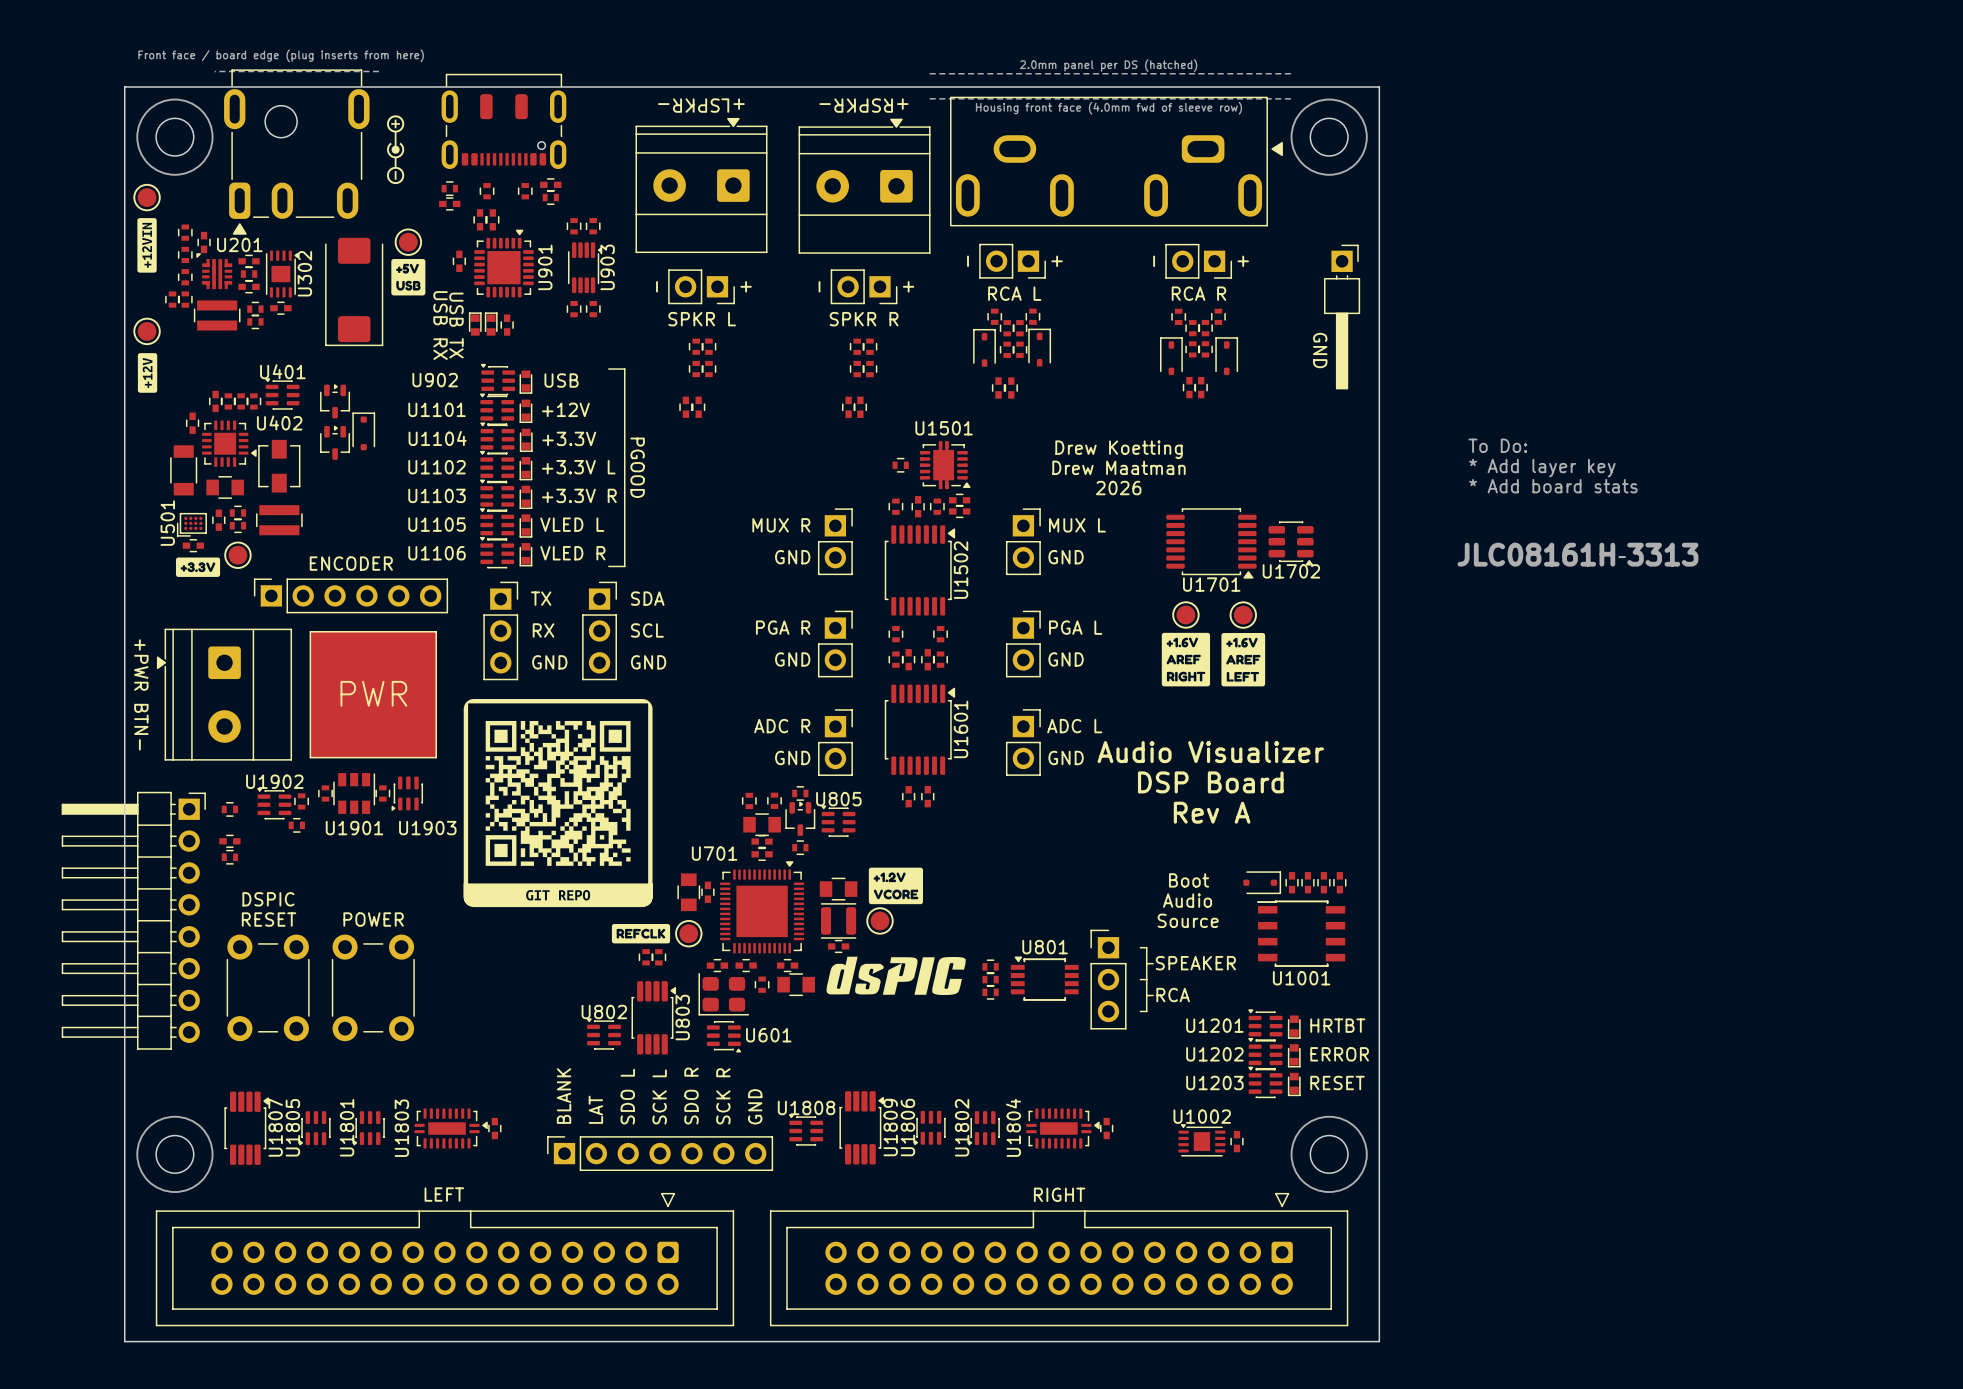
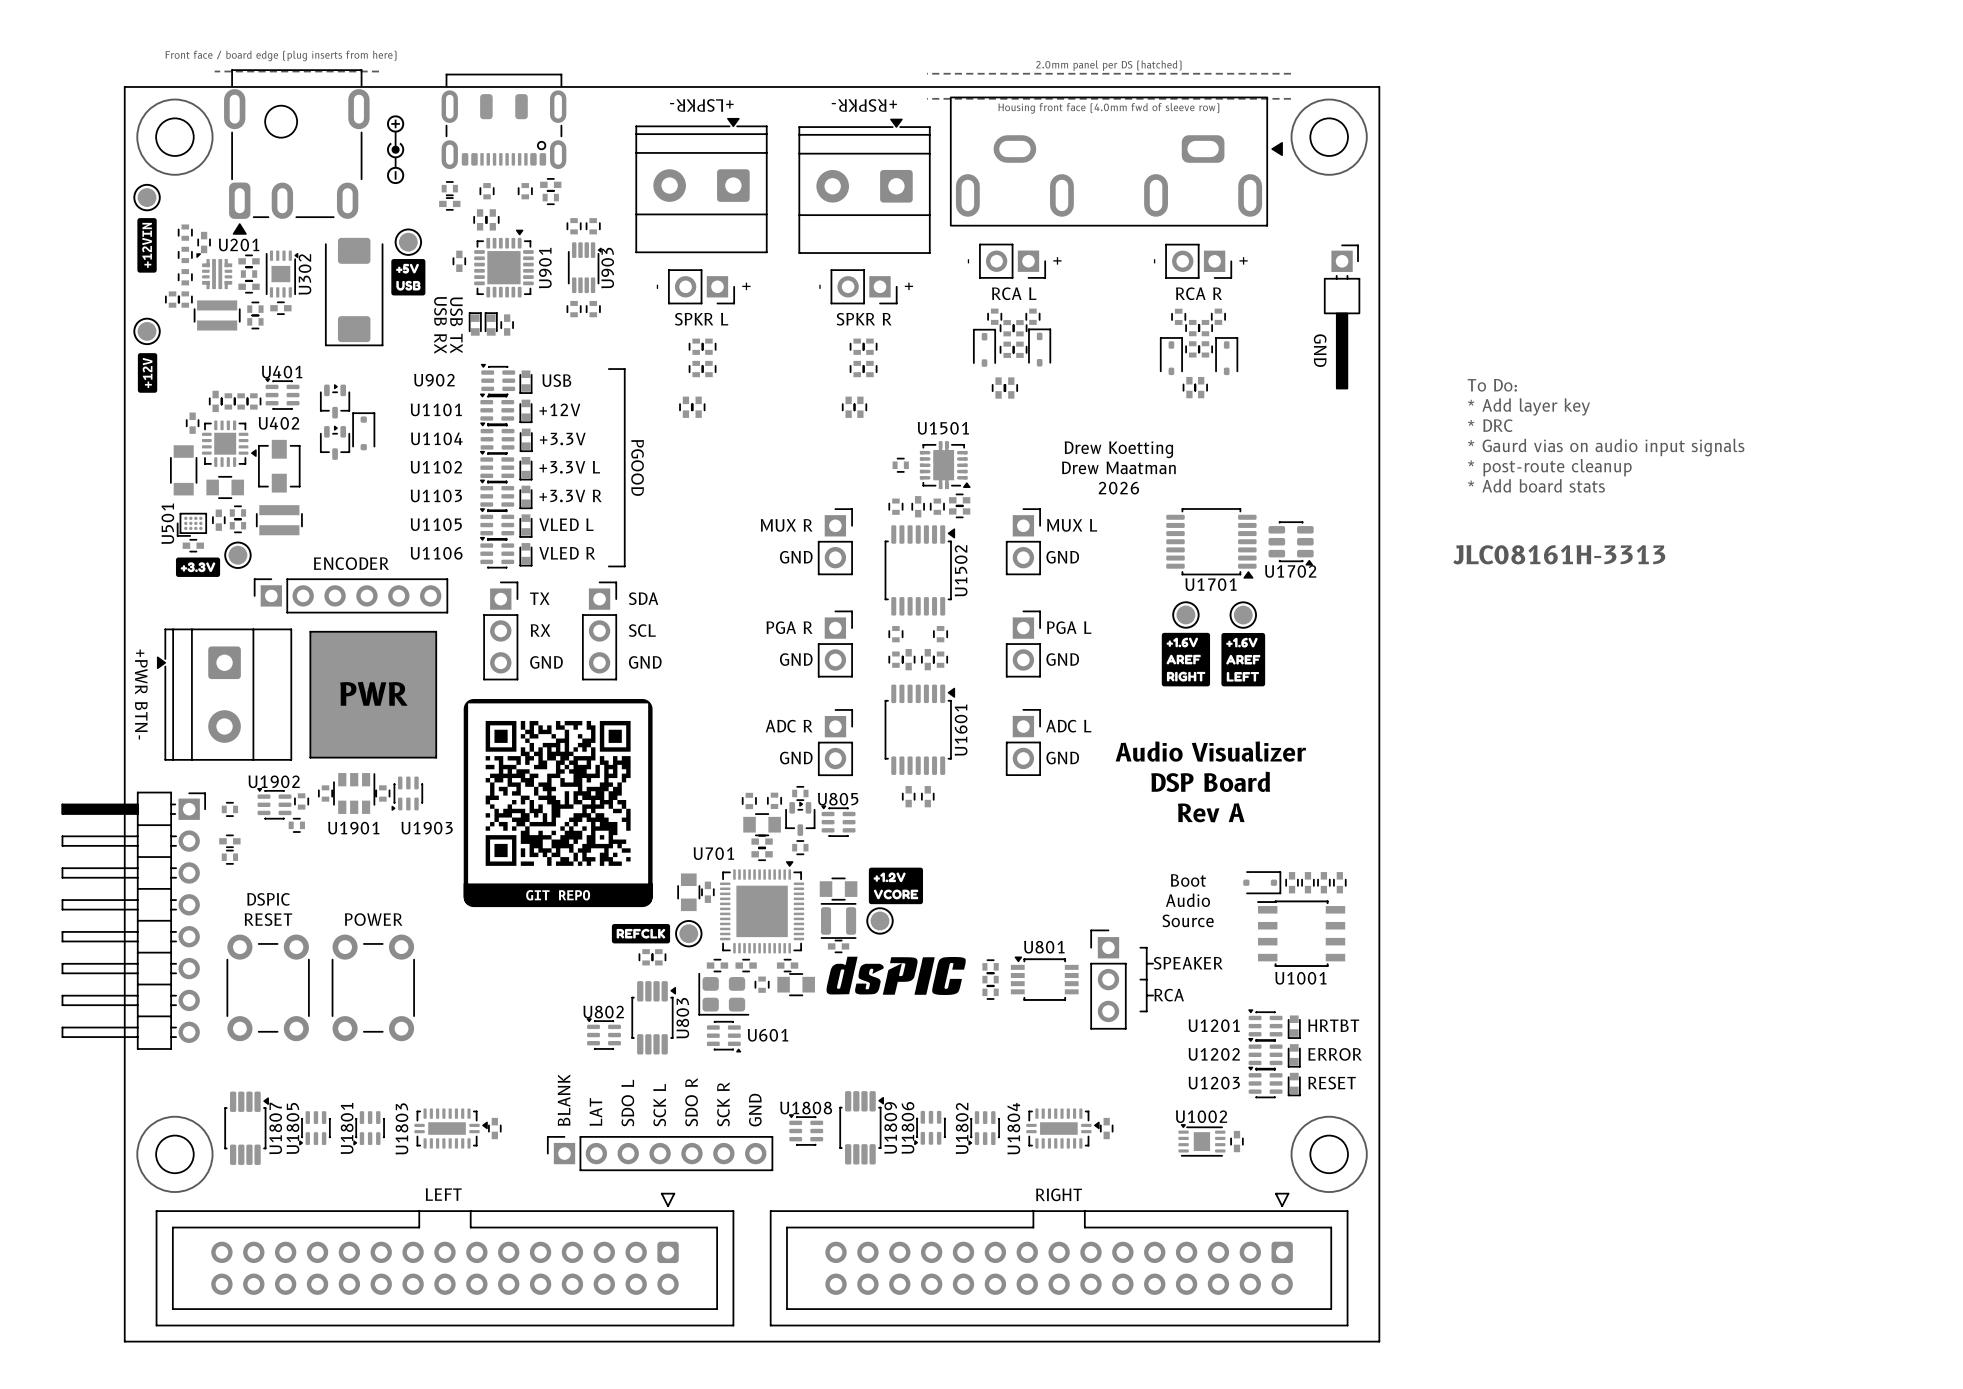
text: none -> To Do: (1492, 385)
text: none -> * Add layer key (1529, 406)
text: none -> * DRC (1490, 425)
text: To Do: (1497, 445) -> * Gaurd vias on audio input signals (1606, 447)
text: * Add layer key (1542, 468) -> * post-route cleanup (1549, 467)

